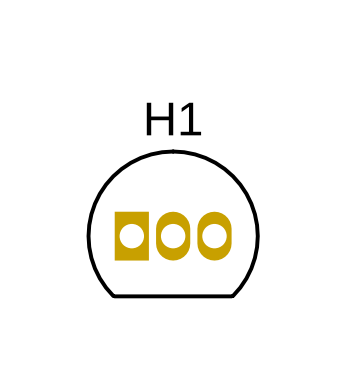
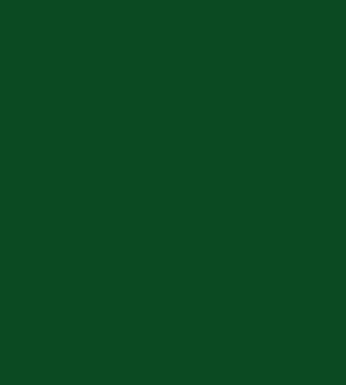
H1: (173, 223) -> none

